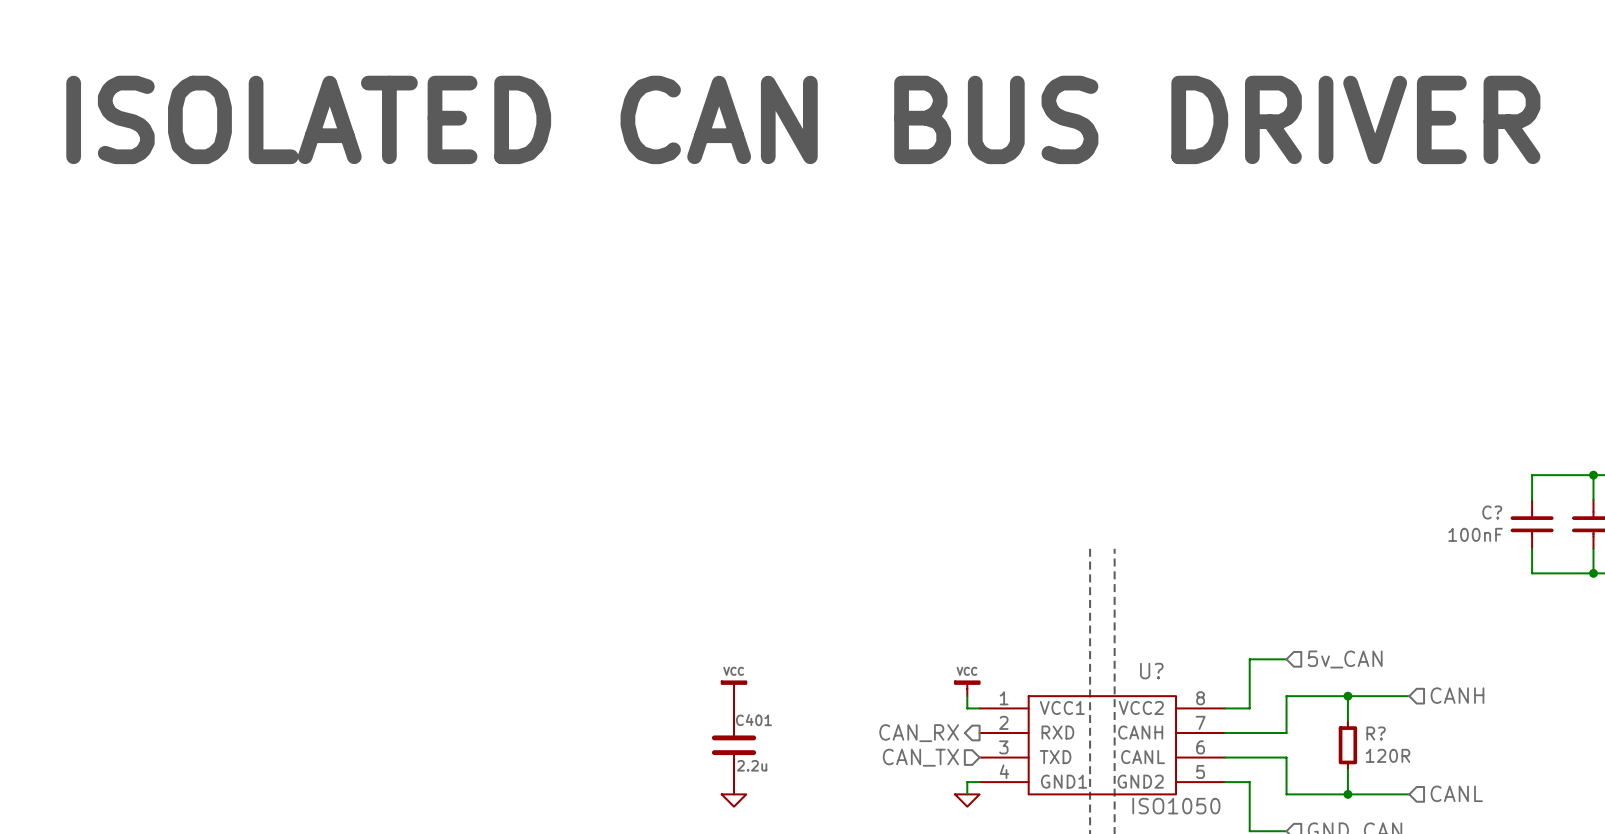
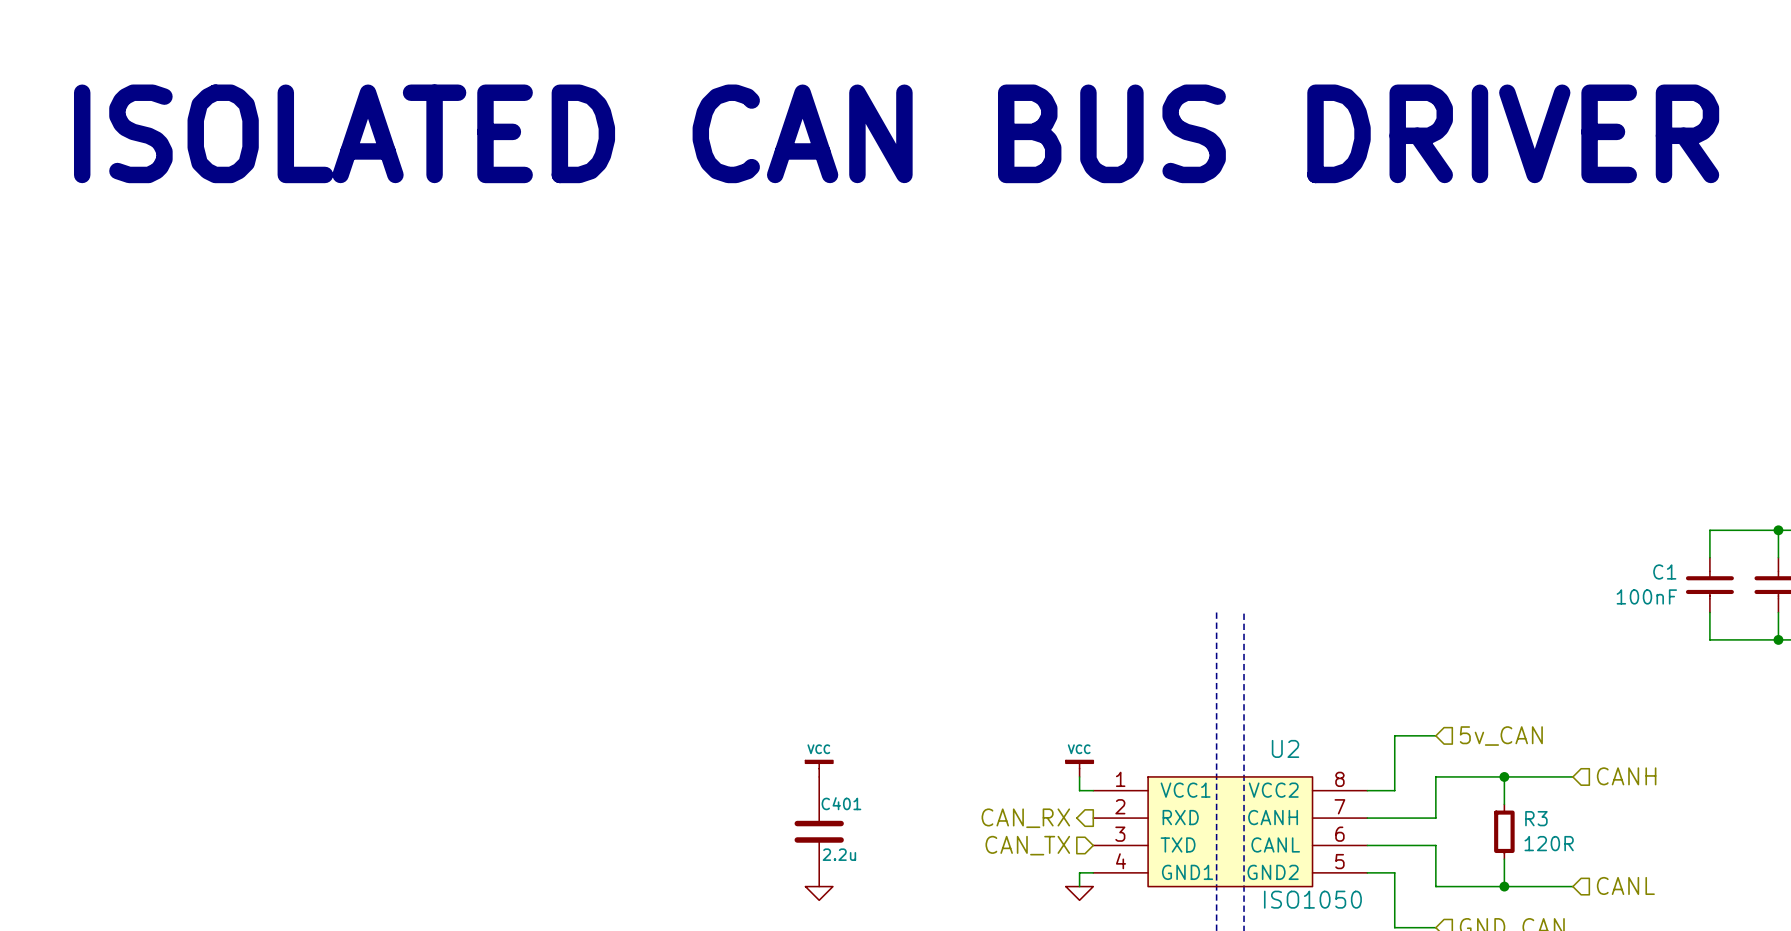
C? name: C? (1492, 512) -> C1 (1664, 571)
U? name: U? (1151, 671) -> U2 (1285, 748)
R? name: R? (1376, 733) -> R3 (1536, 818)

